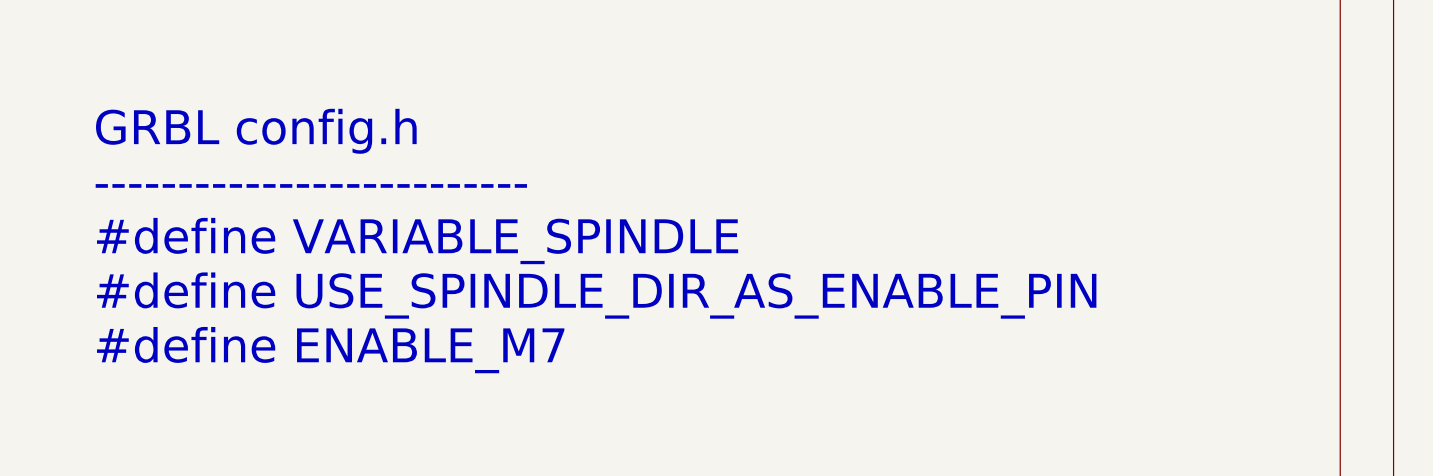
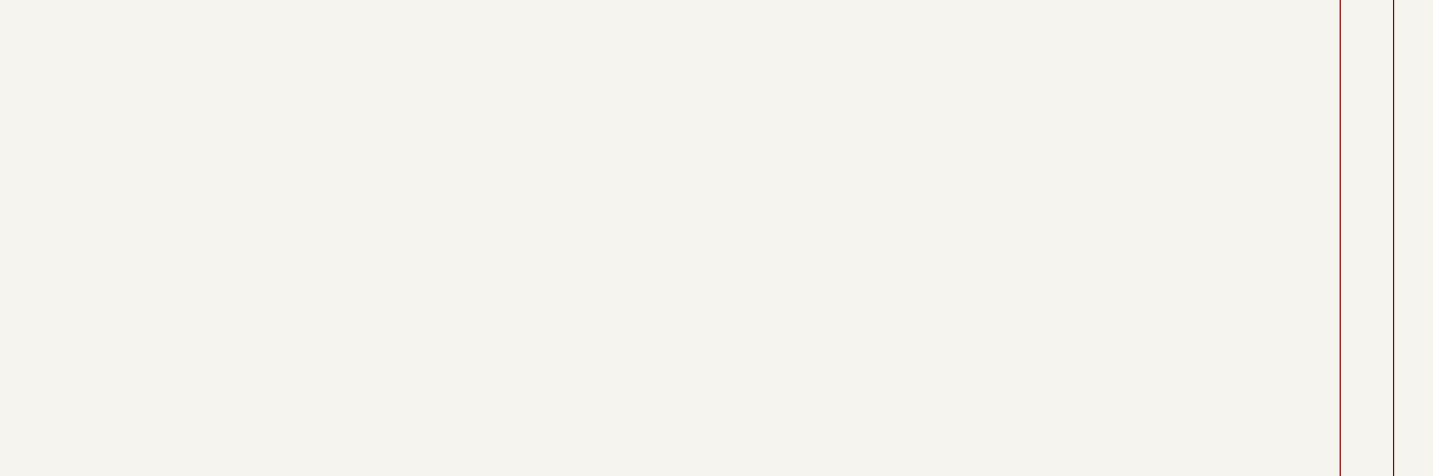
text: GRBL config.h (256, 131) -> none
text: -------------------------- (311, 185) -> none
text: #define VARIABLE_SPINDLE (417, 241) -> none
text: #define USE_SPINDLE_DIR_AS_ENABLE_PIN (596, 295) -> none
text: #define ENABLE_M7 (330, 350) -> none

